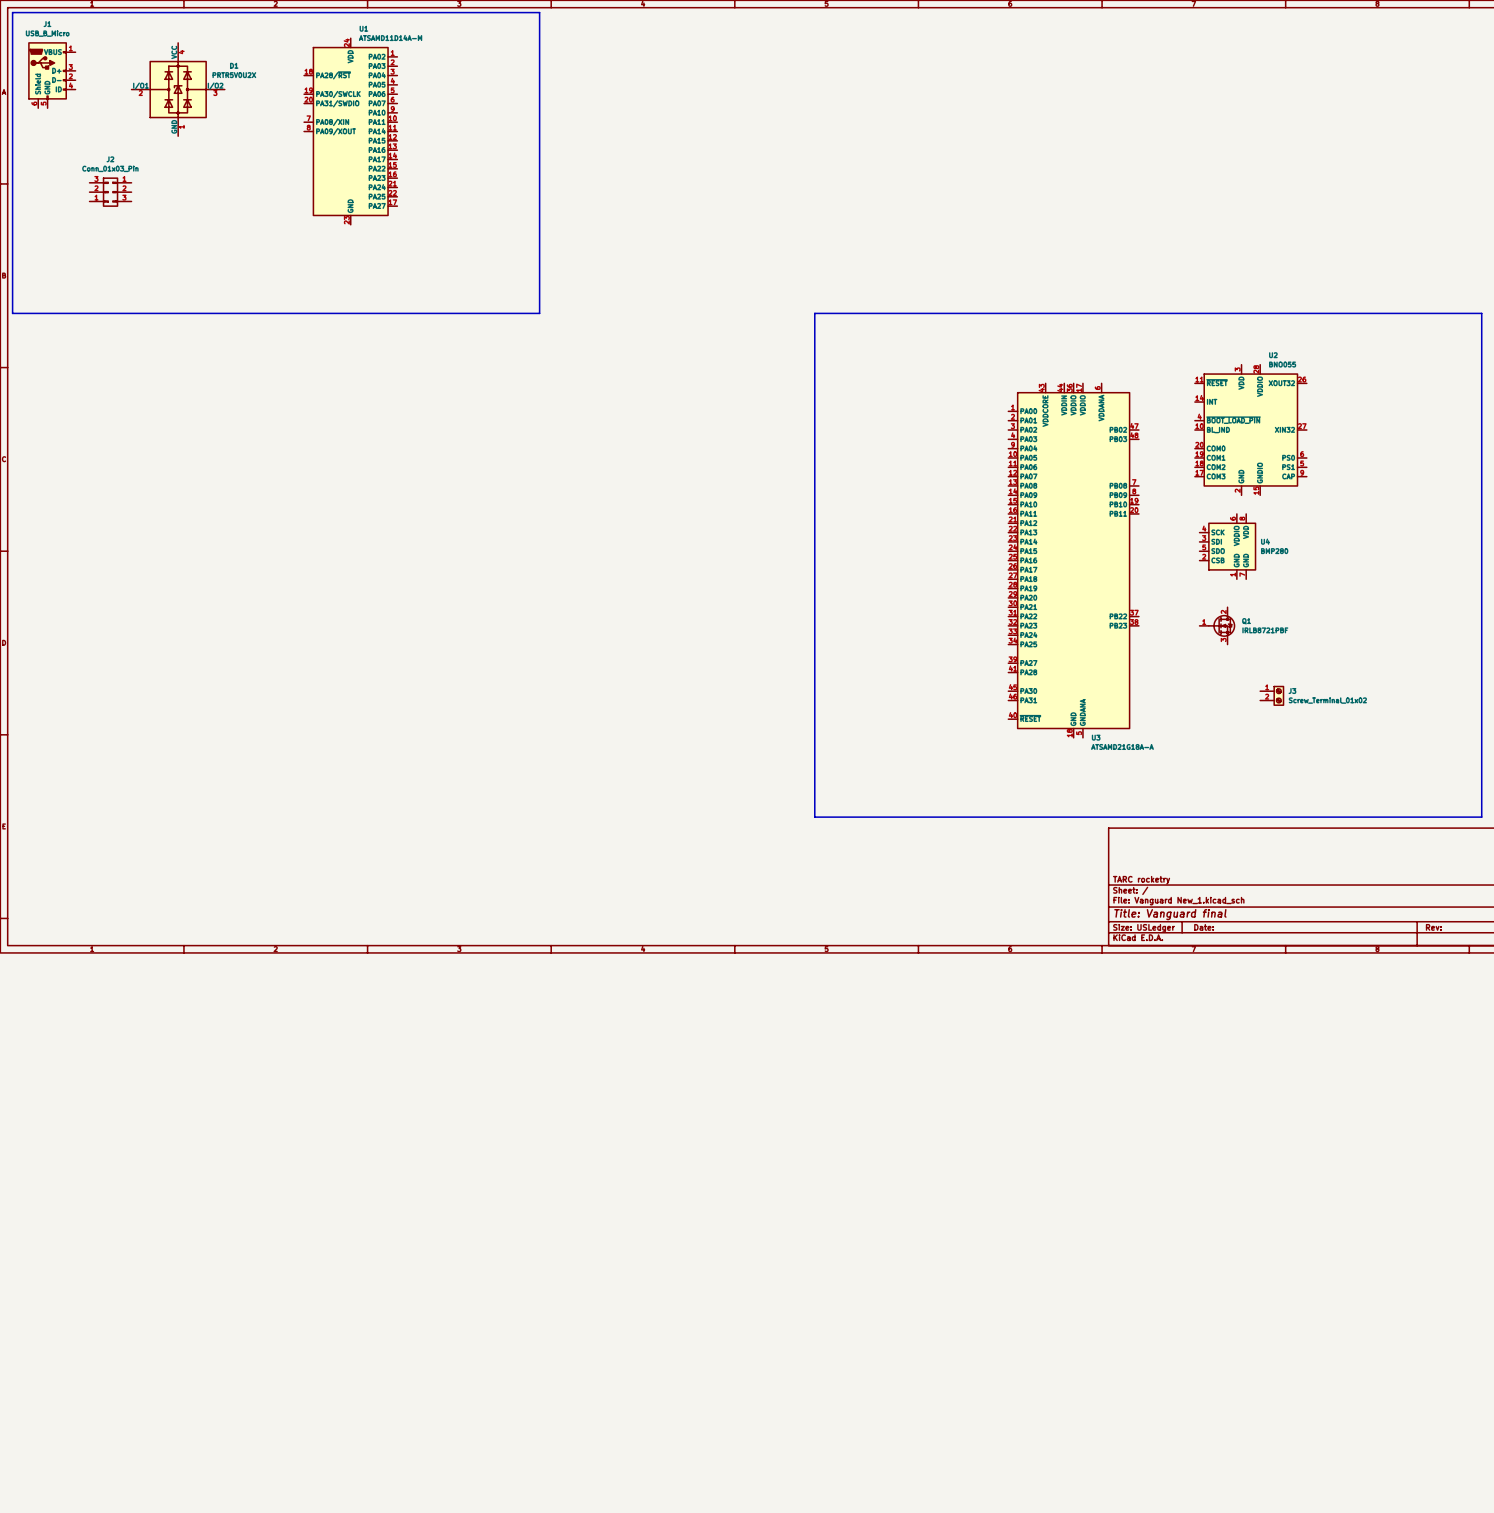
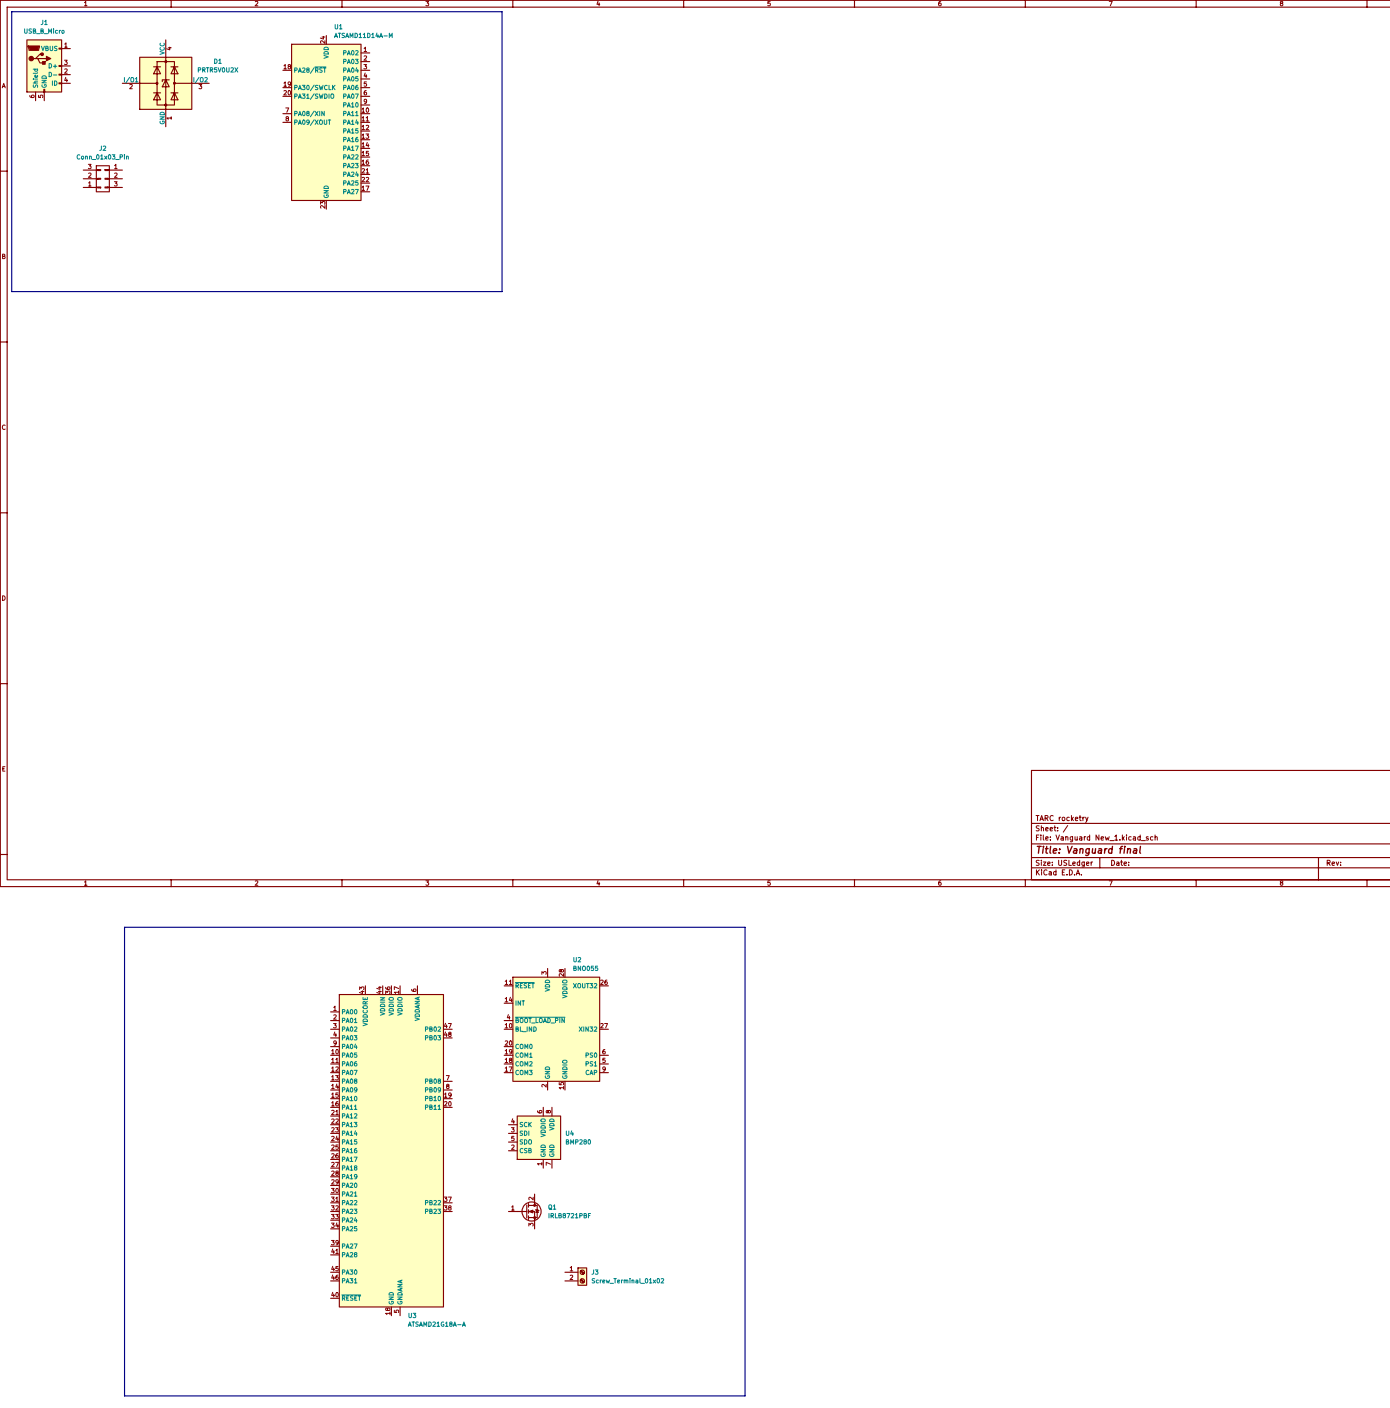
line: (814, 313) (1481, 313) (1481, 817) (814, 817) (814, 313) -> none
part position: (1250, 430) -> (556, 1029)
part position: (1227, 546) -> (534, 1137)
part position: (1073, 560) -> (391, 1150)
part position: (1217, 625) -> (525, 1211)
part position: (1272, 695) -> (576, 1276)
line: none -> (124, 927) (745, 927) (745, 1395) (124, 1395) (124, 927)

